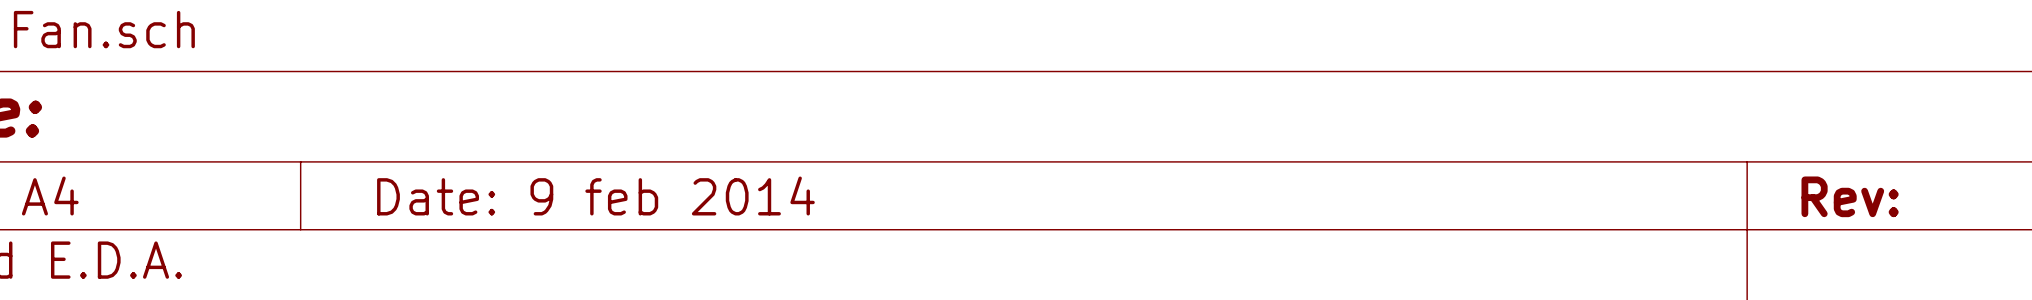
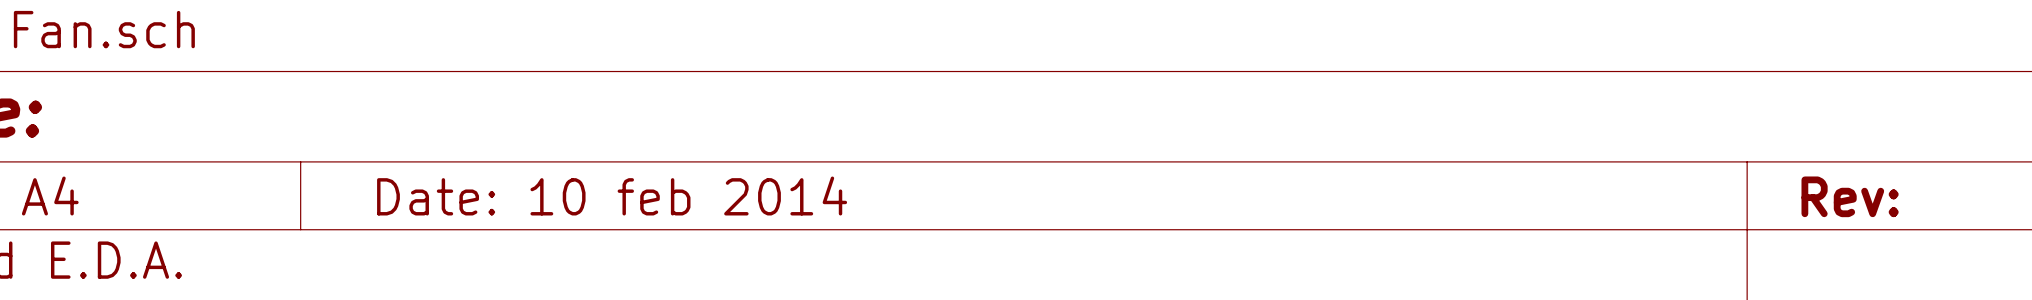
title block: Date: 9 feb 2014 (595, 196) -> Date: 10 feb 2014 (612, 196)

